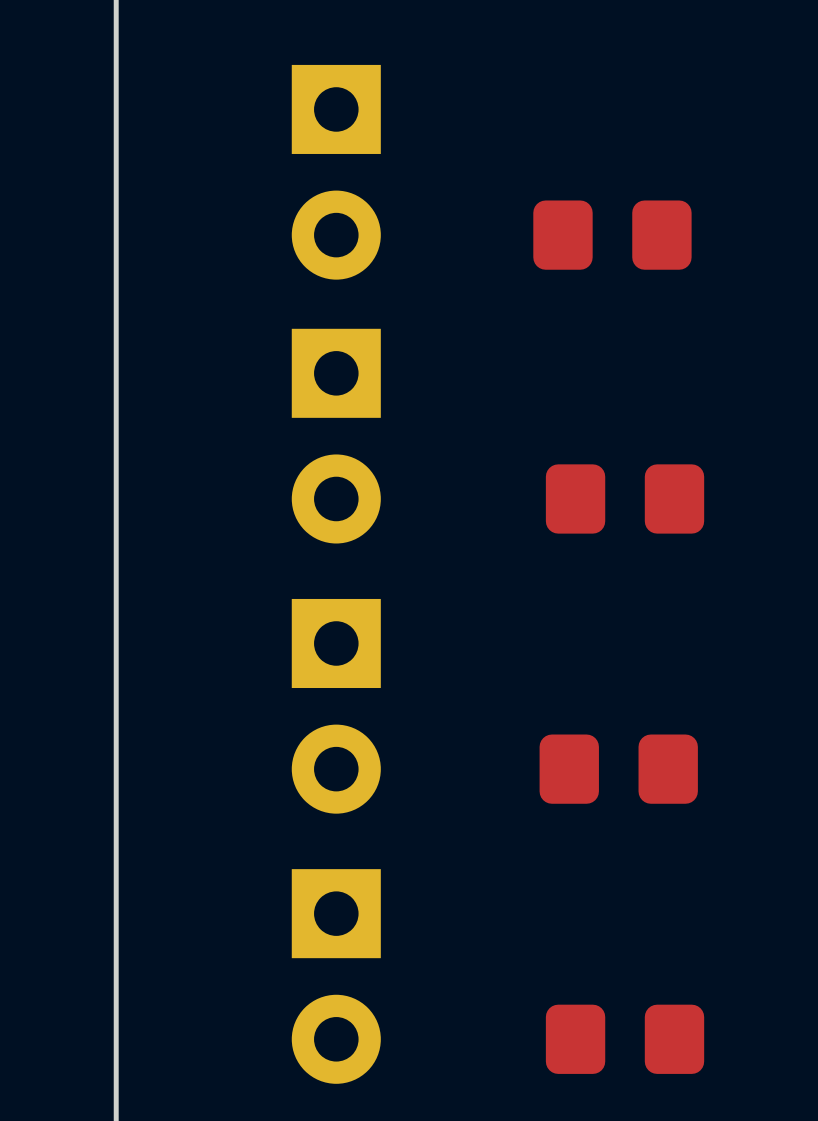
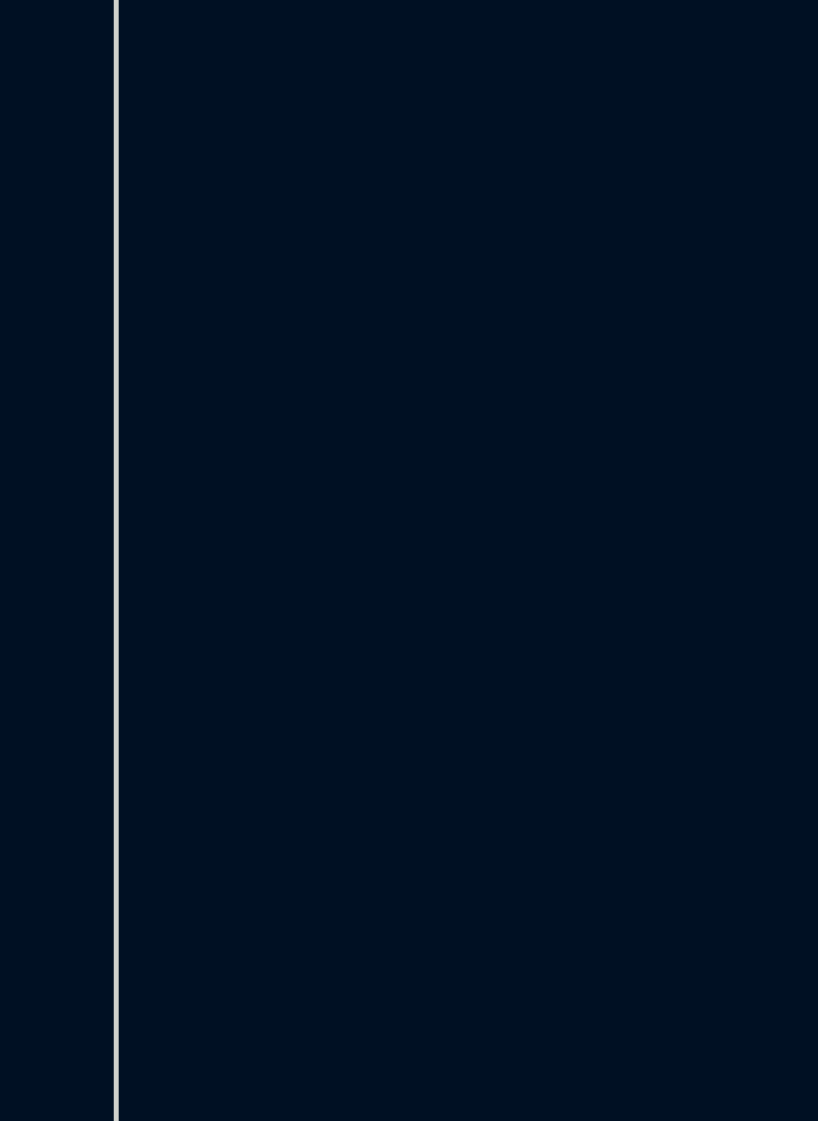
part: (336, 172) -> none
part: (612, 235) -> none
part: (336, 436) -> none
part: (625, 498) -> none
part: (336, 706) -> none
part: (618, 769) -> none
part: (336, 976) -> none
part: (625, 1039) -> none

